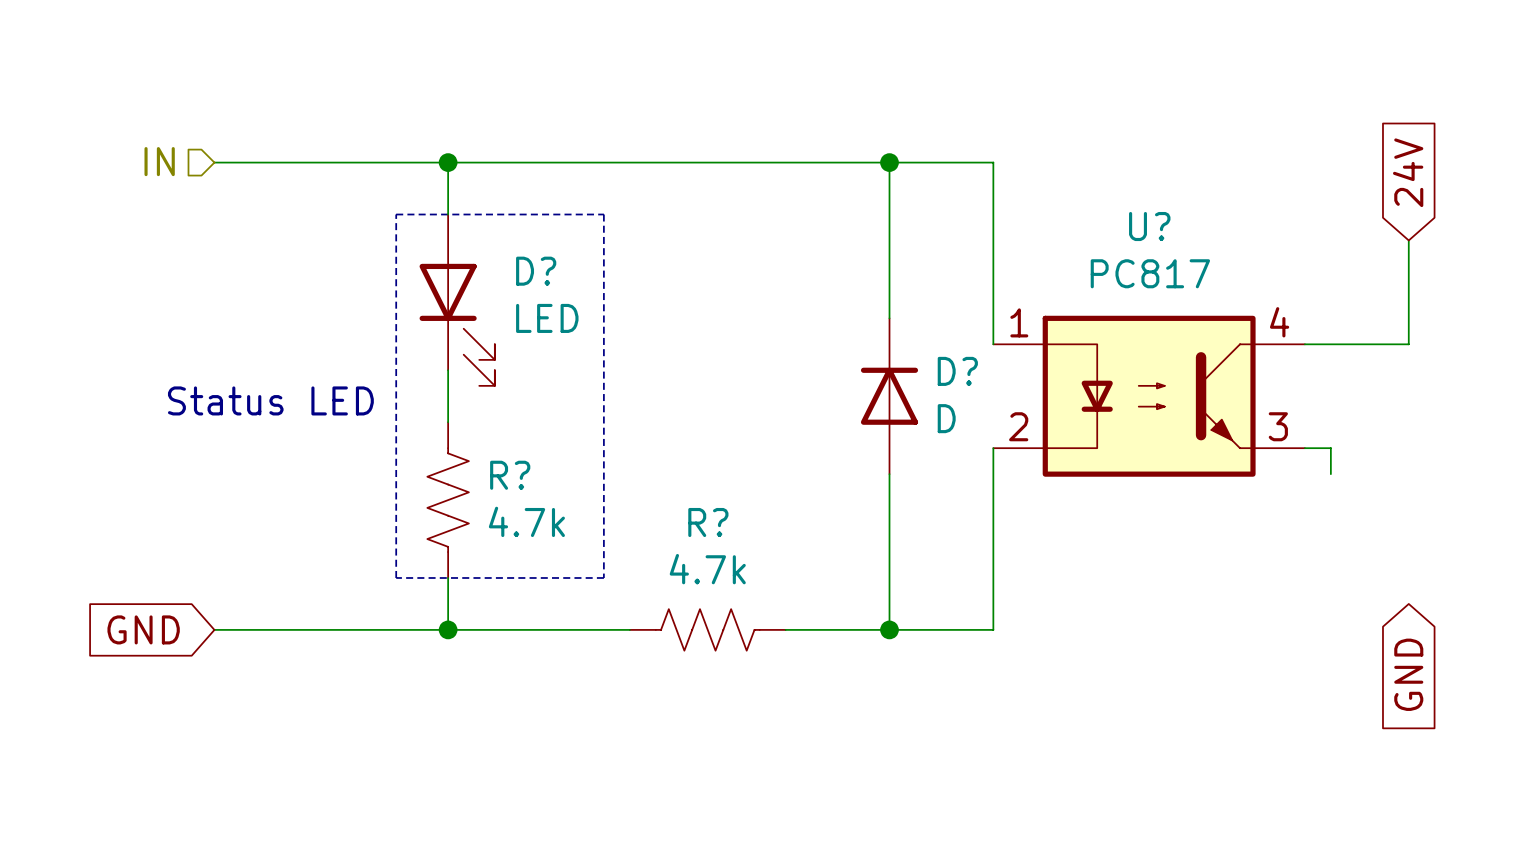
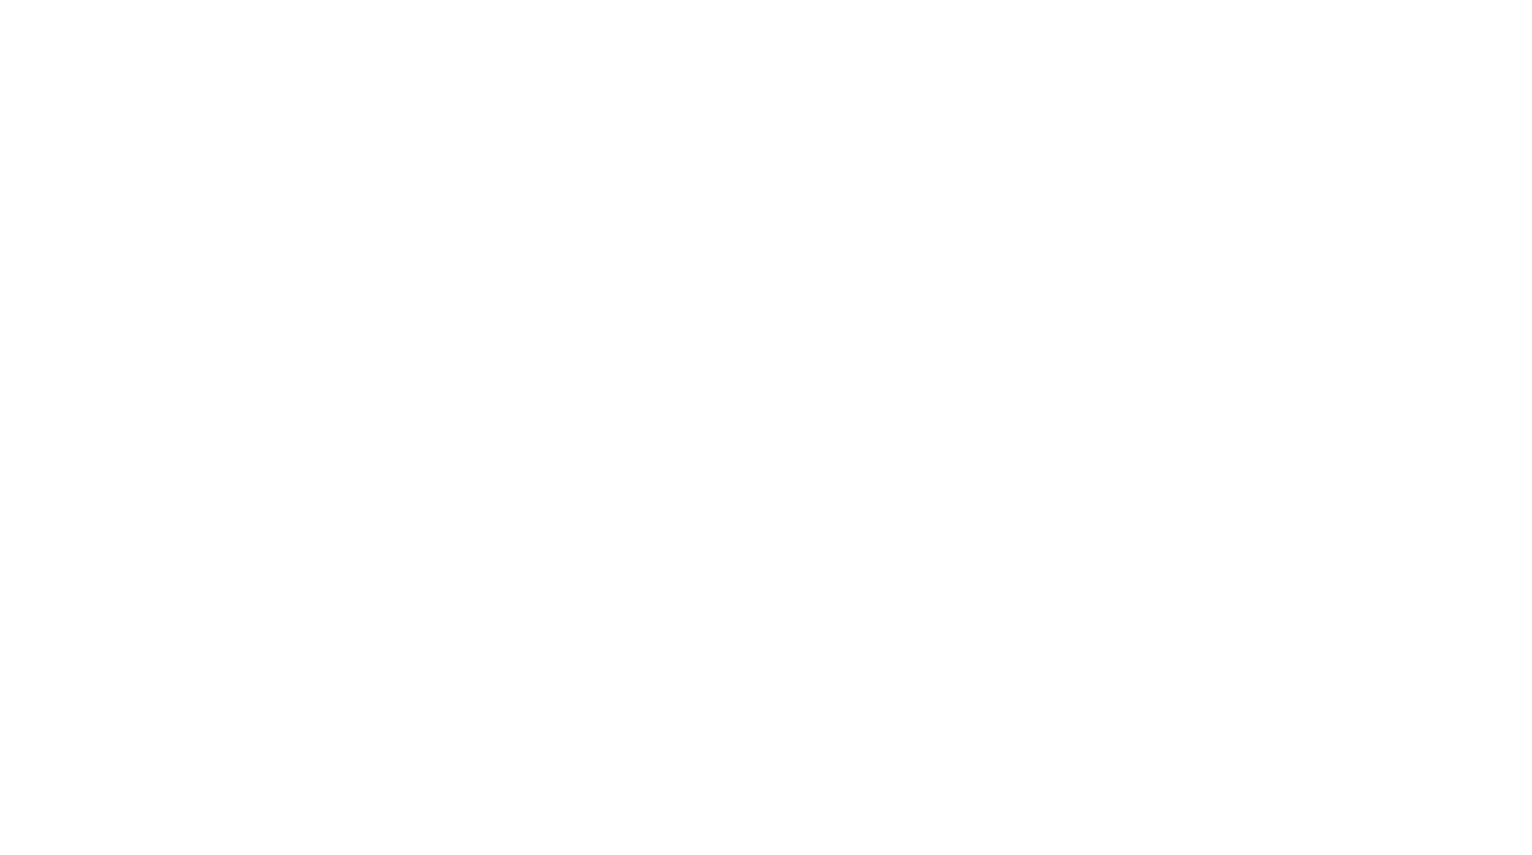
hierarchical label: IN (159, 161) -> none
wire: (214, 162) (993, 162) (993, 344) -> none
wire: (448, 162) (448, 214) -> none
junction: (448, 162) -> none
wire: (889, 162) (889, 318) -> none
junction: (889, 162) -> none
global label: 24V (1408, 172) -> none
line: (396, 214) (603, 214) (603, 577) (396, 577) (396, 214) -> none
wire: (1408, 240) (1408, 344) (1304, 344) -> none
D?: LED (457, 300) -> none
wire: (448, 370) (448, 422) -> none
D?: D (889, 396) -> none
U?: PC817 (1149, 396) -> none
text: Status LED (270, 400) -> none
wire: (993, 448) (993, 629) (785, 629) -> none
wire: (1304, 448) (1330, 448) (1330, 474) -> none
wire: (889, 474) (889, 629) -> none
R?: 4.7k (448, 500) -> none
wire: (448, 577) (448, 629) -> none
global label: GND (143, 629) -> none
wire: (214, 629) (629, 629) -> none
junction: (448, 629) -> none
R?: 4.7k (707, 629) -> none
junction: (889, 629) -> none
global label: GND (1408, 674) -> none

